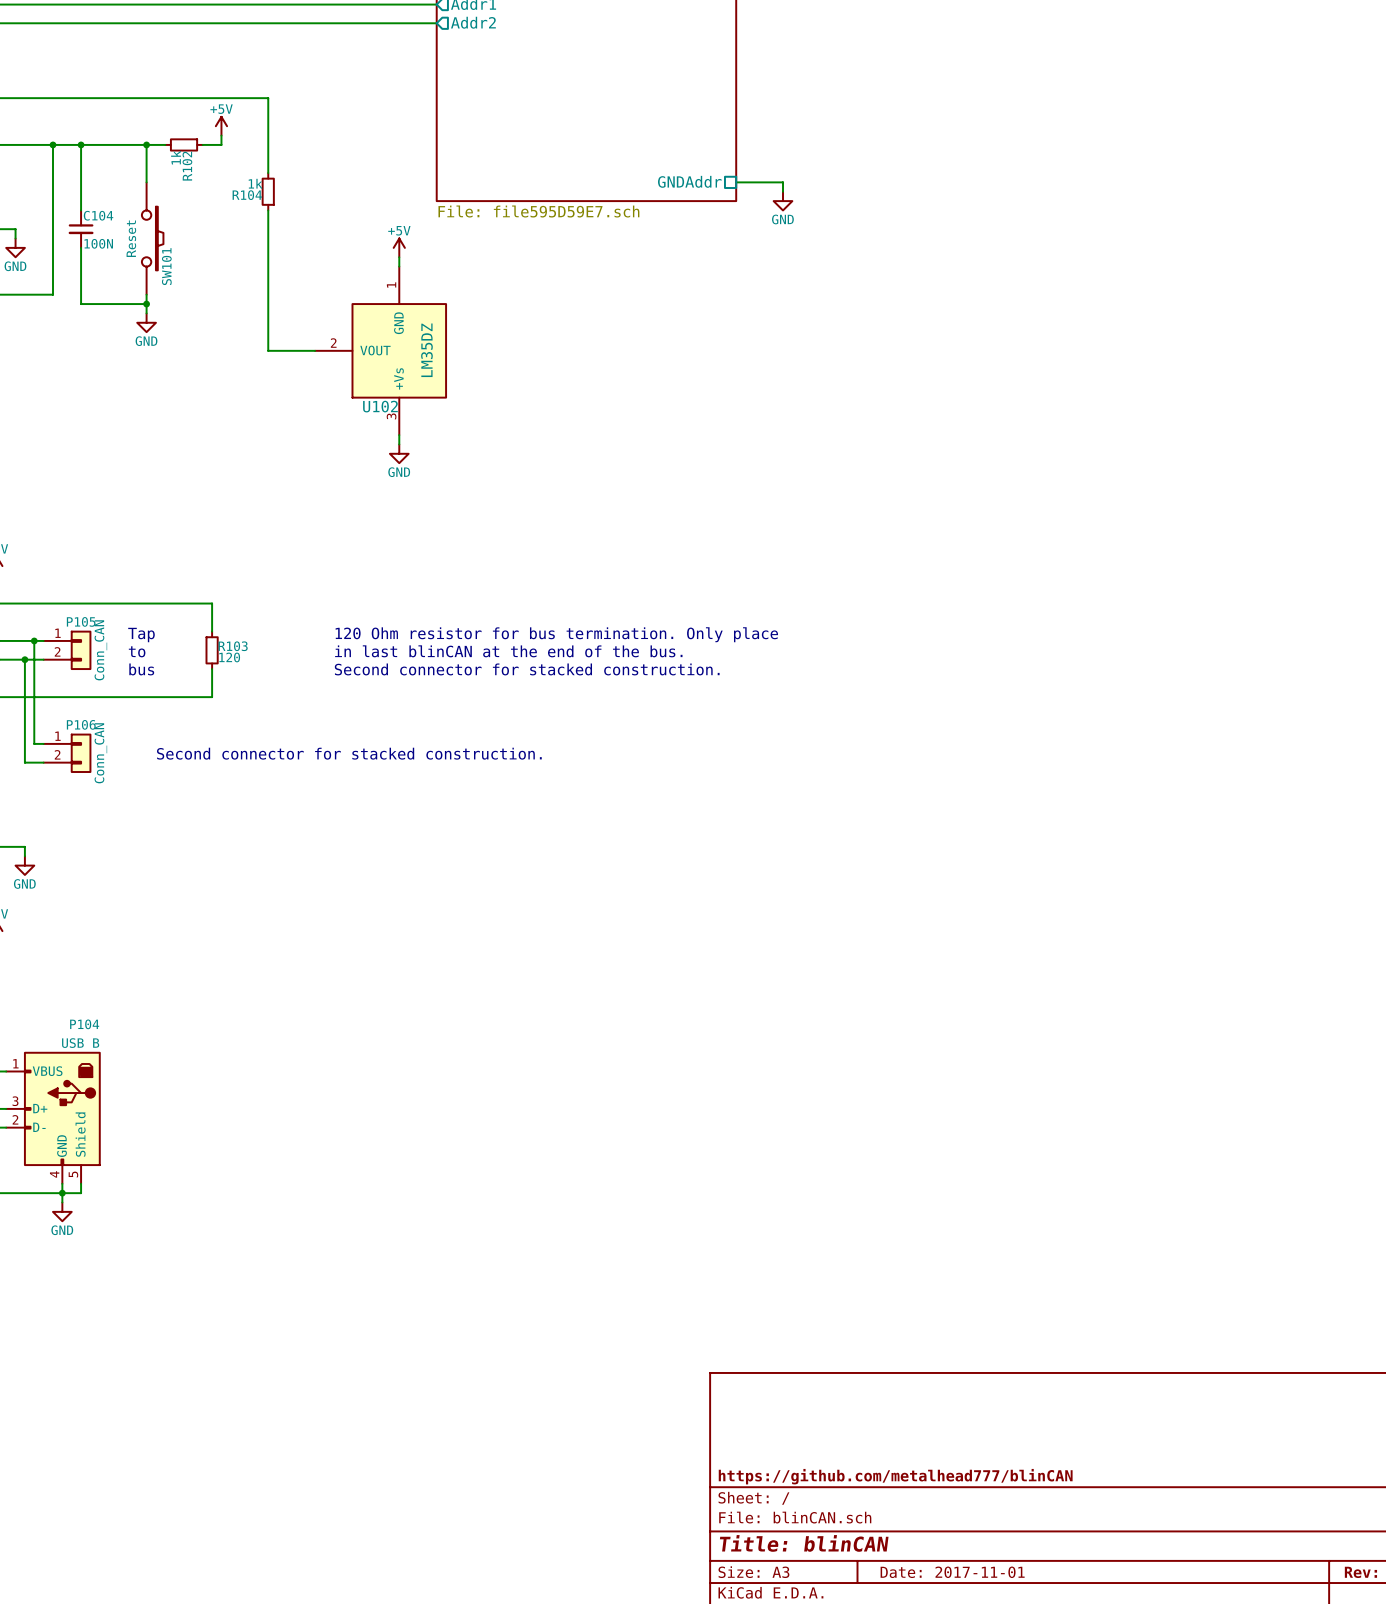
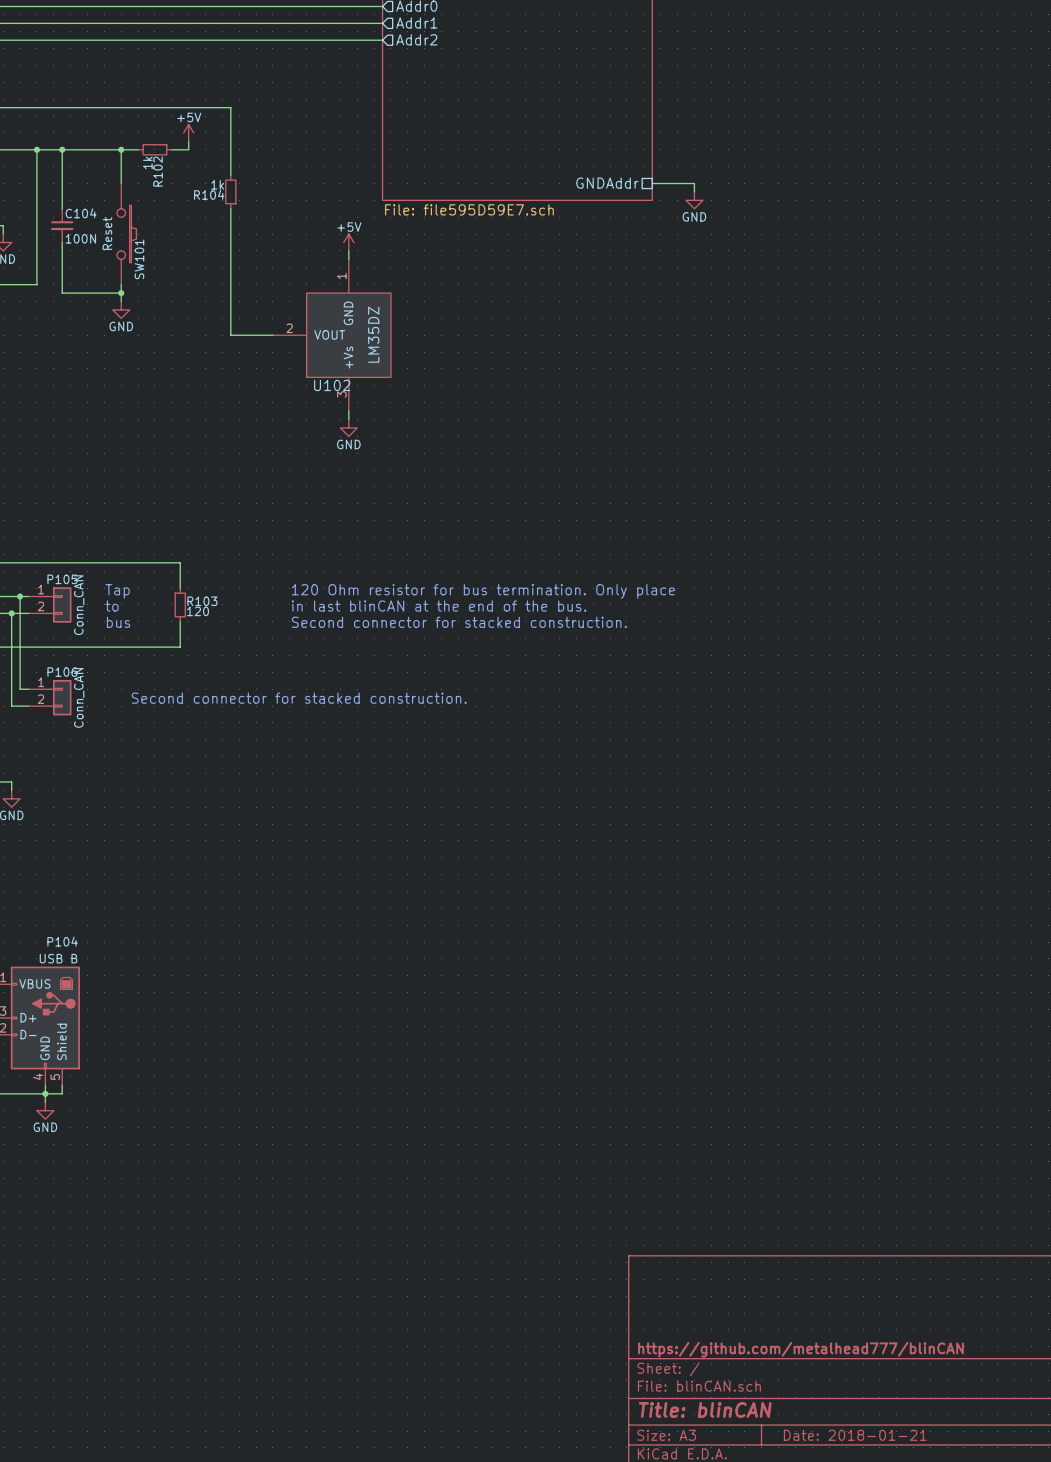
title block: Date: 2017-11-01 (952, 1572) -> Date: 2018-01-21 (855, 1435)

